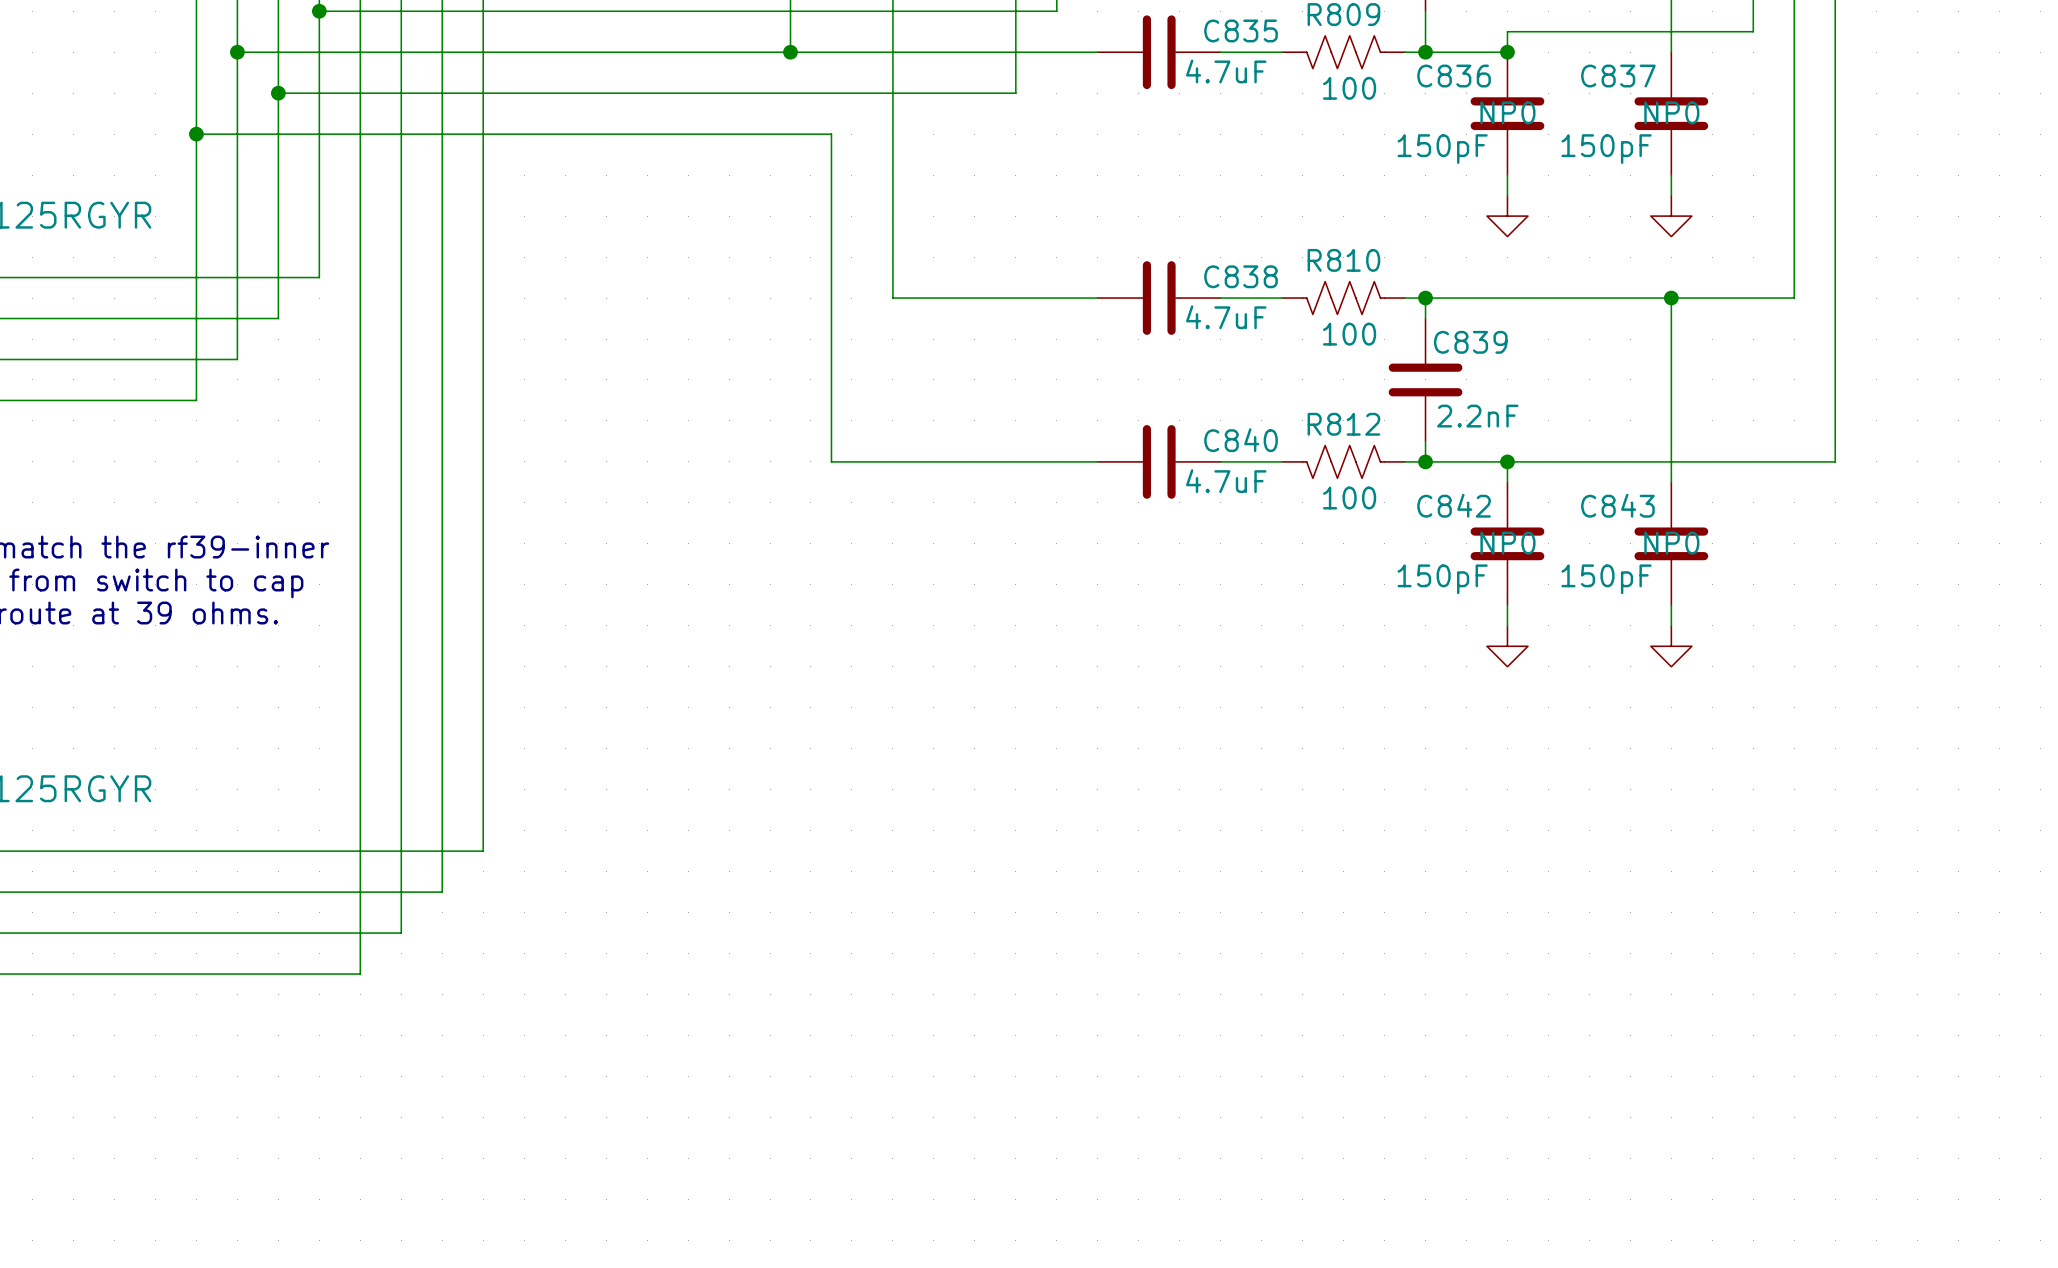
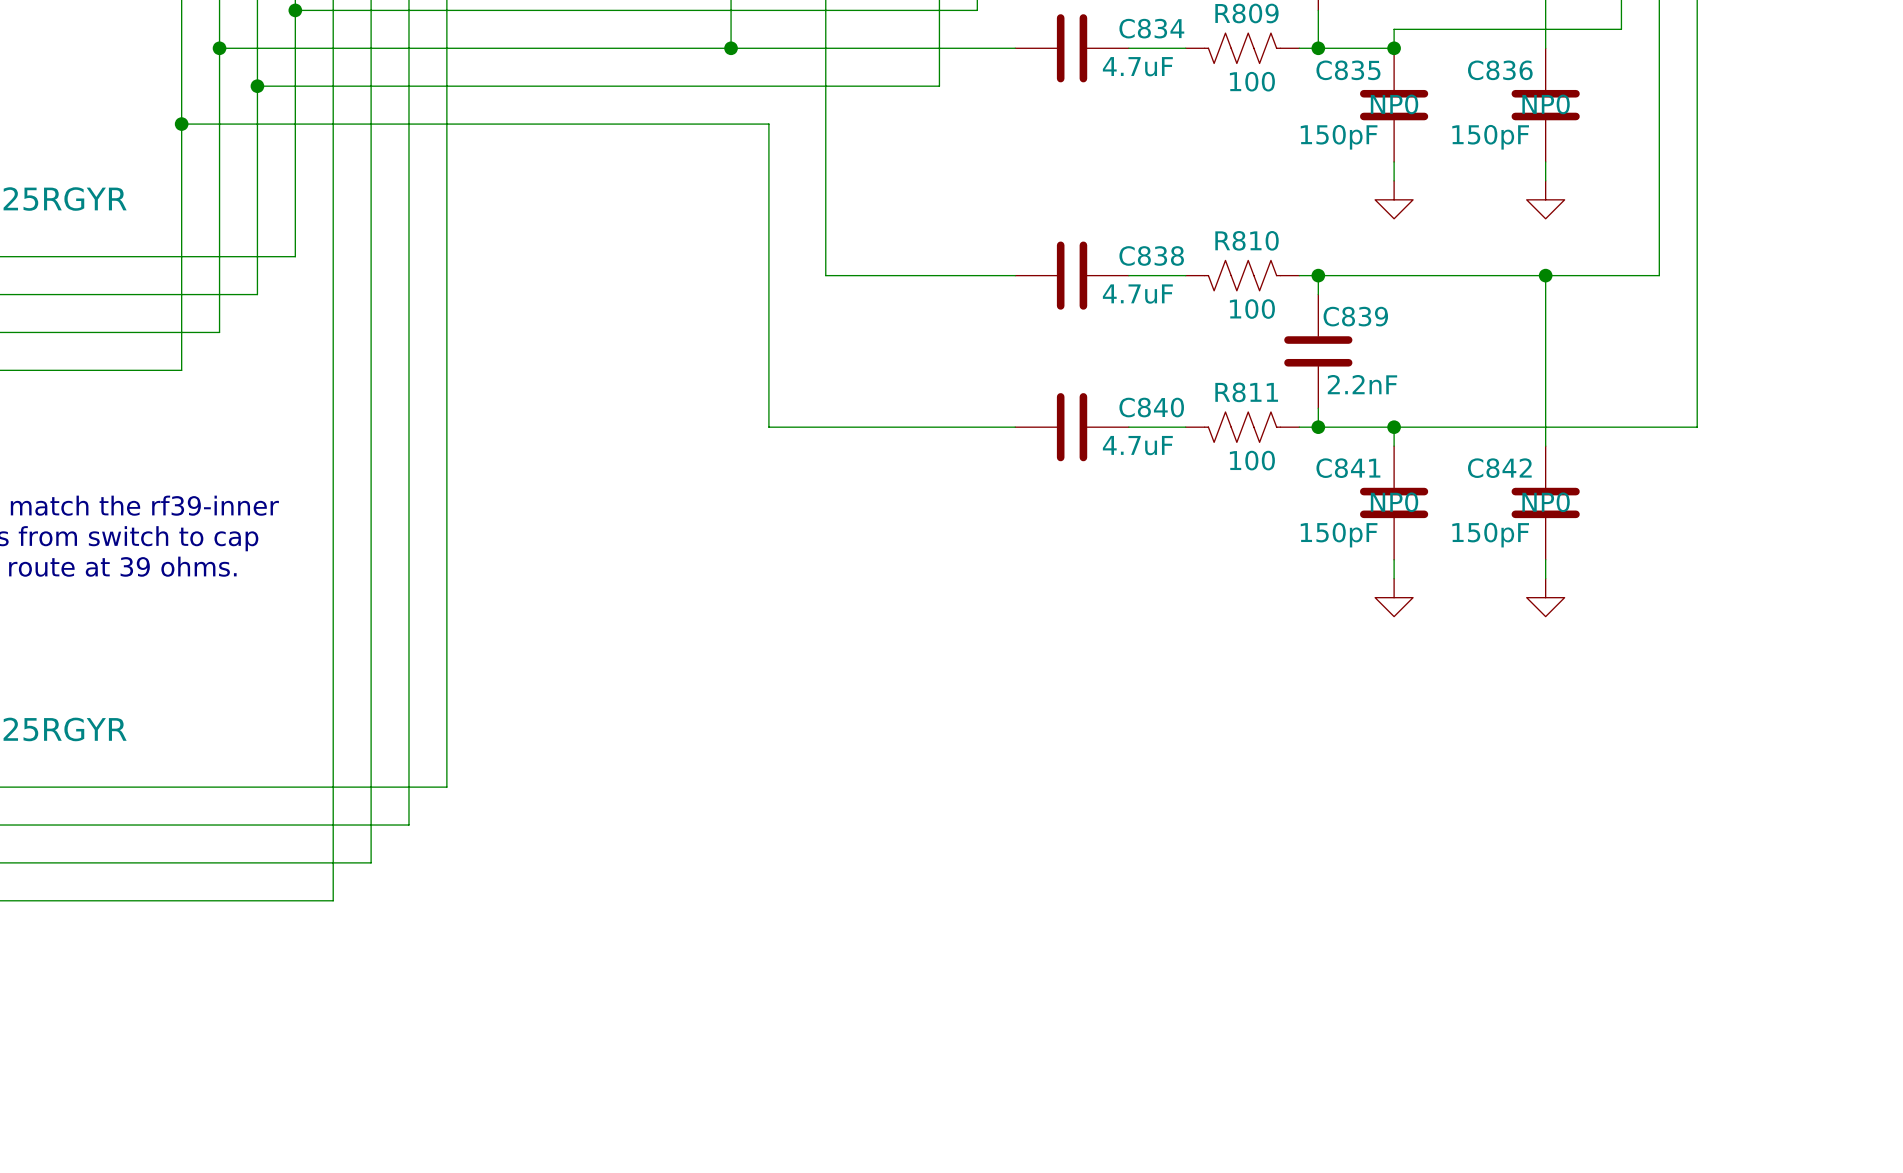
C835 name: C835 (1241, 30) -> C834 (1151, 28)
C836 name: C836 (1454, 76) -> C835 (1348, 70)
C837 name: C837 (1618, 76) -> C836 (1500, 70)
R812 name: R812 (1343, 424) -> R811 (1246, 392)
C842 name: C842 (1454, 505) -> C841 (1348, 468)
C843 name: C843 (1617, 505) -> C842 (1499, 468)

